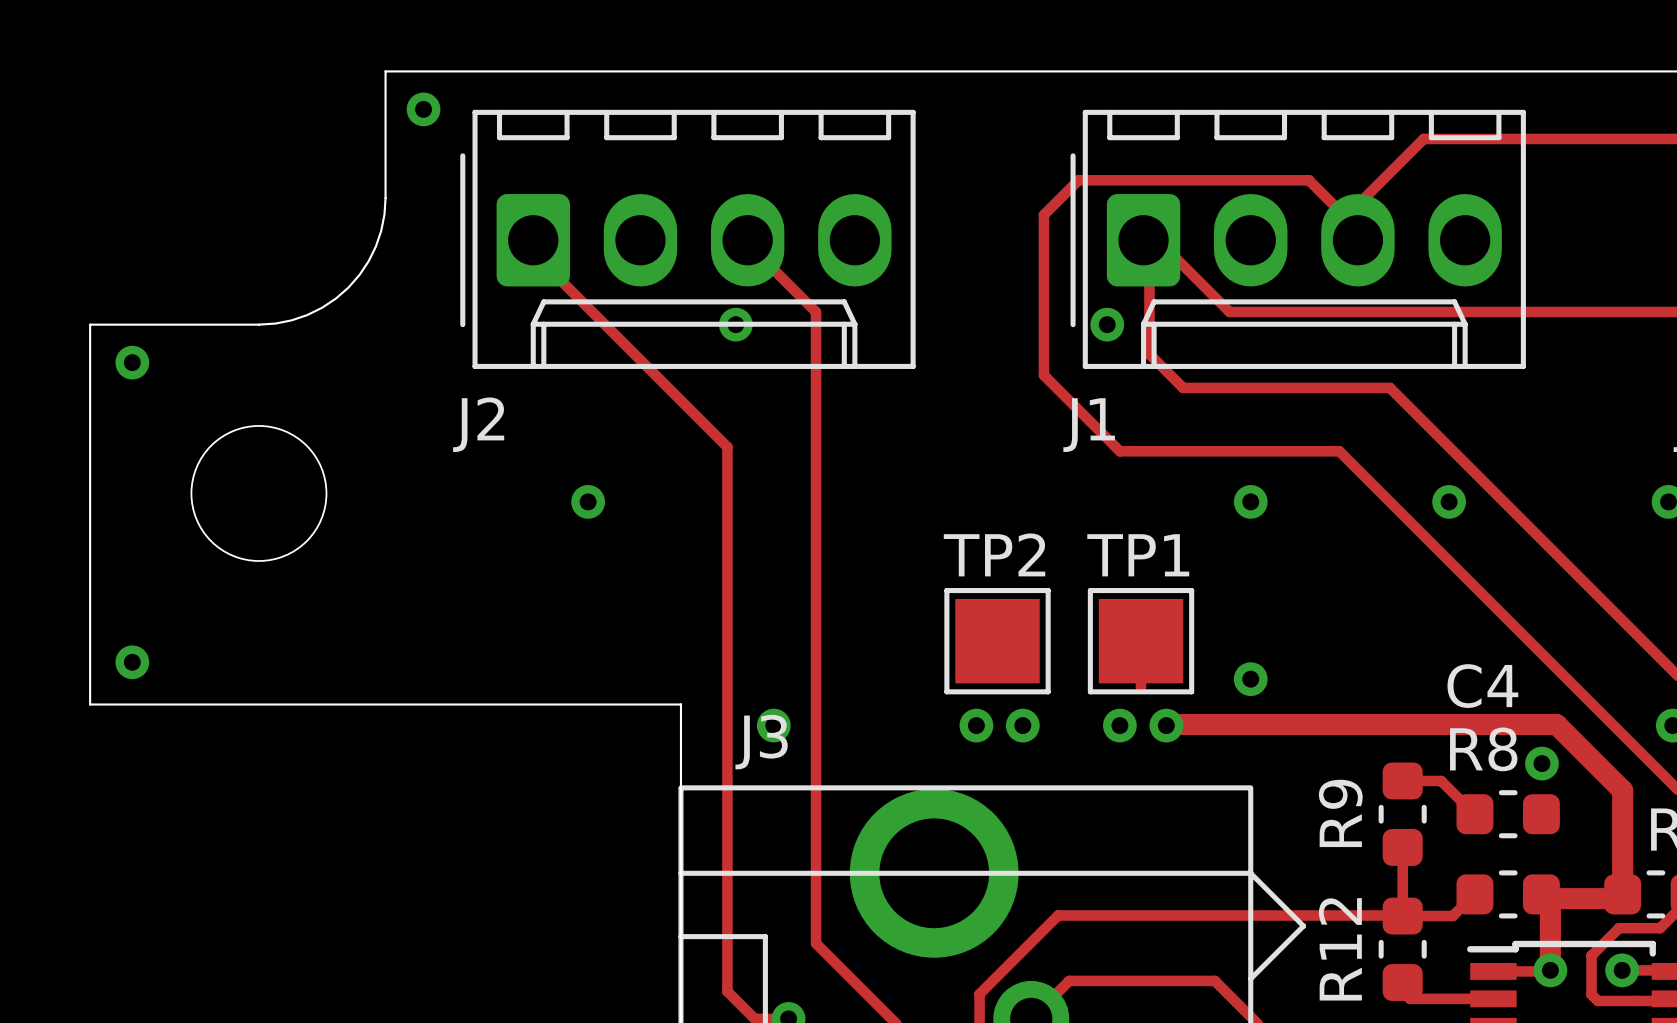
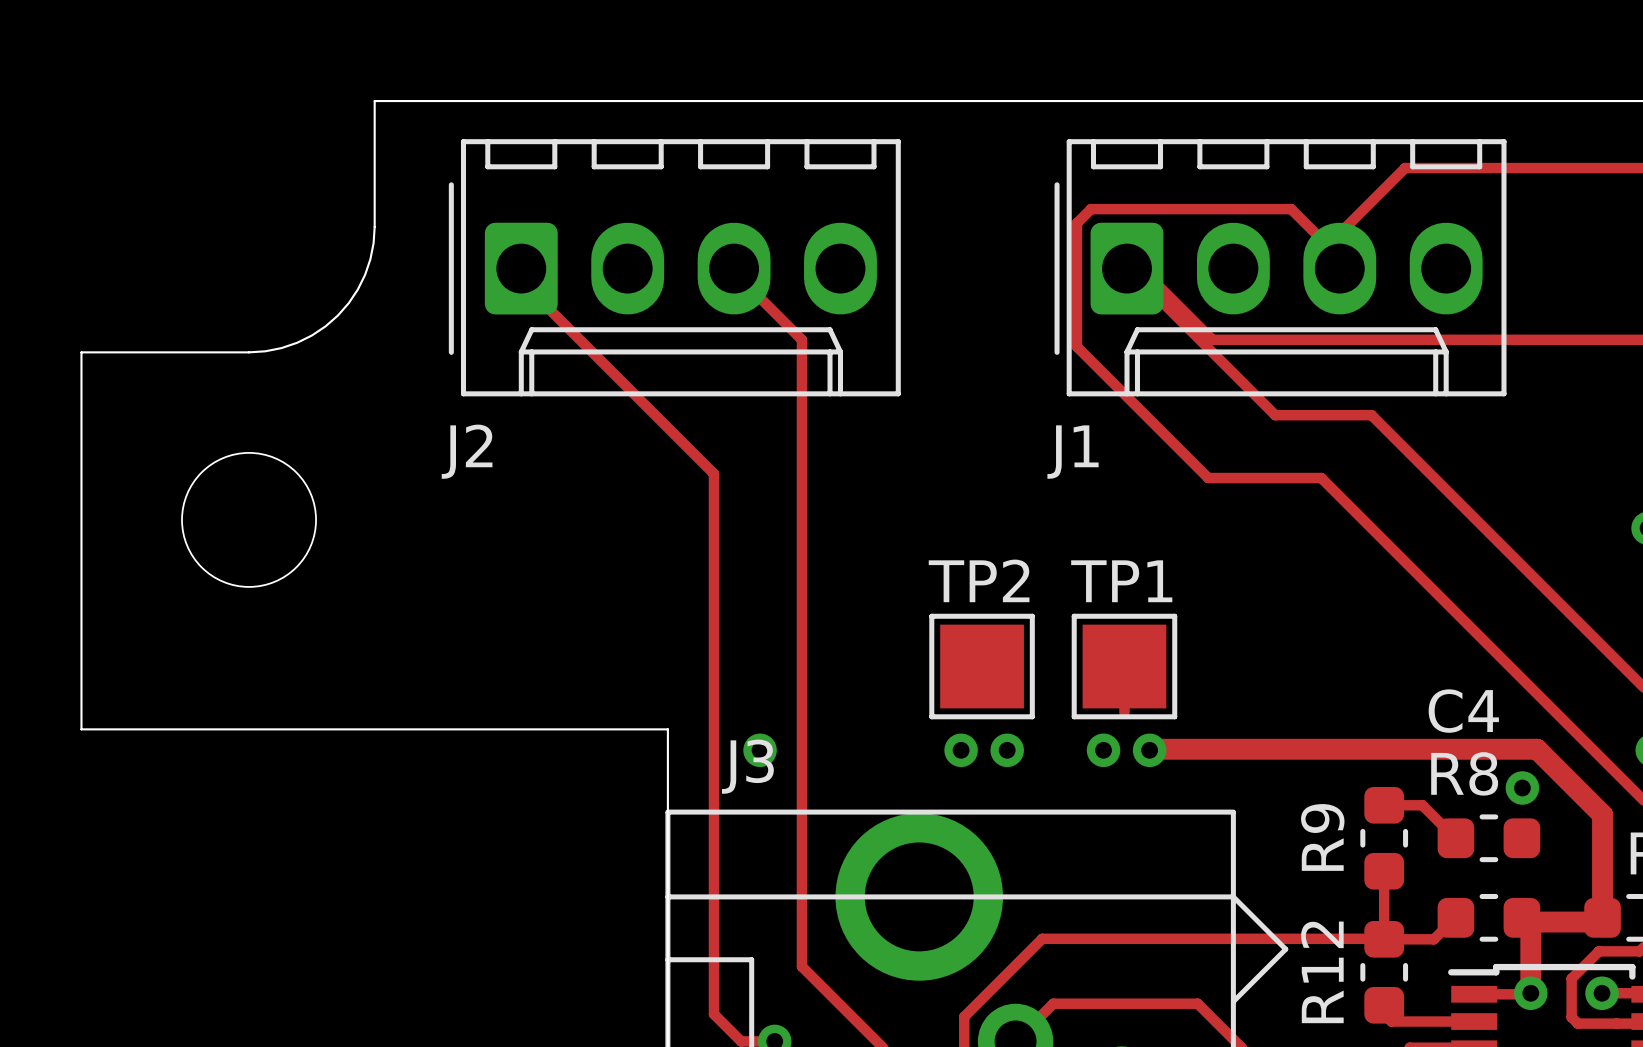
via: (423, 109) -> none
track: (1107, 180) (1078, 180) (1043, 214) (1043, 375) (1119, 451) (1225, 451) -> (1091, 209) (1076, 223) (1076, 346) (1208, 478)
track: (1149, 244) (1149, 354) (1183, 387) (1292, 387) -> (1132, 272) (1275, 415)
via: (735, 324) -> none
via: (1107, 324) -> none
via: (132, 362) -> none
via: (588, 501) -> none
via: (1250, 501) -> none
via: (1449, 501) -> none
via: (132, 662) -> none
via: (1250, 679) -> none

